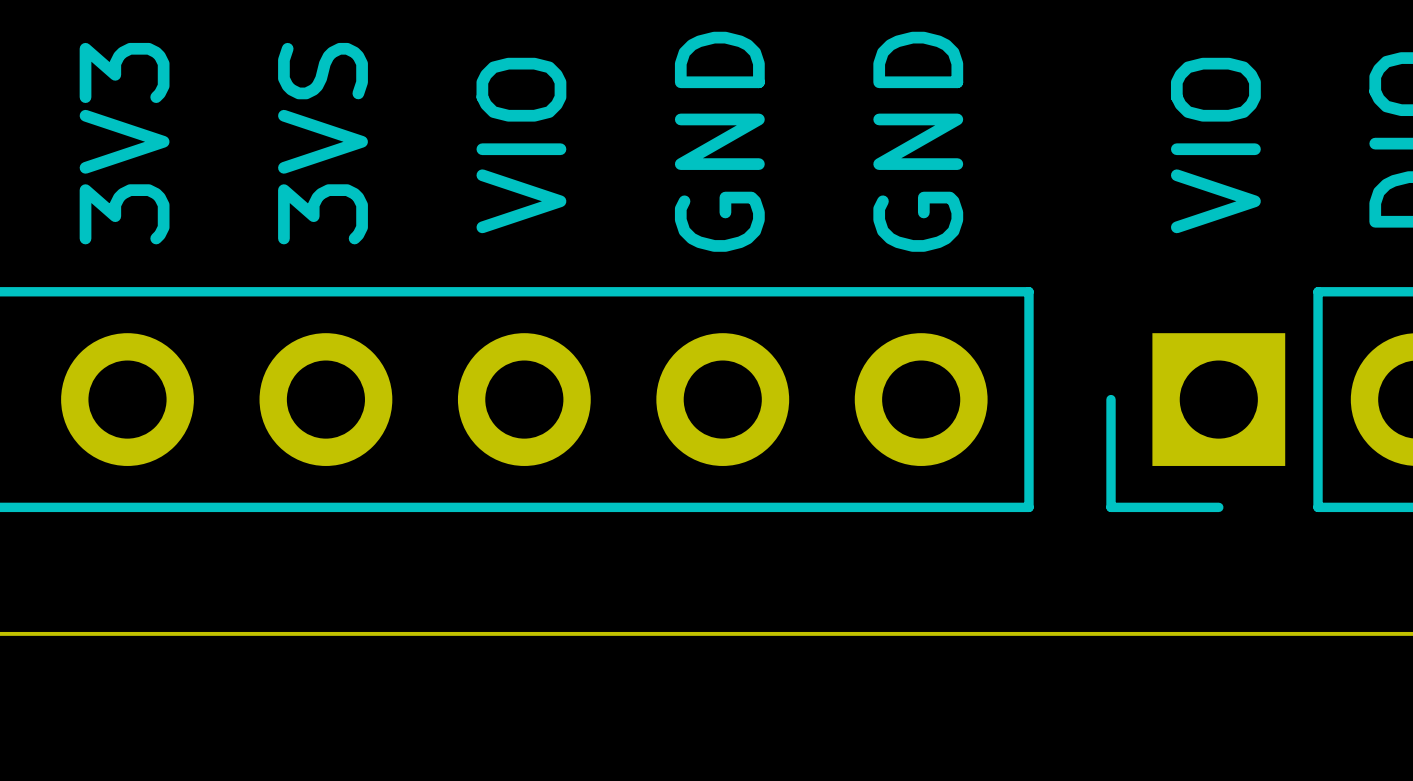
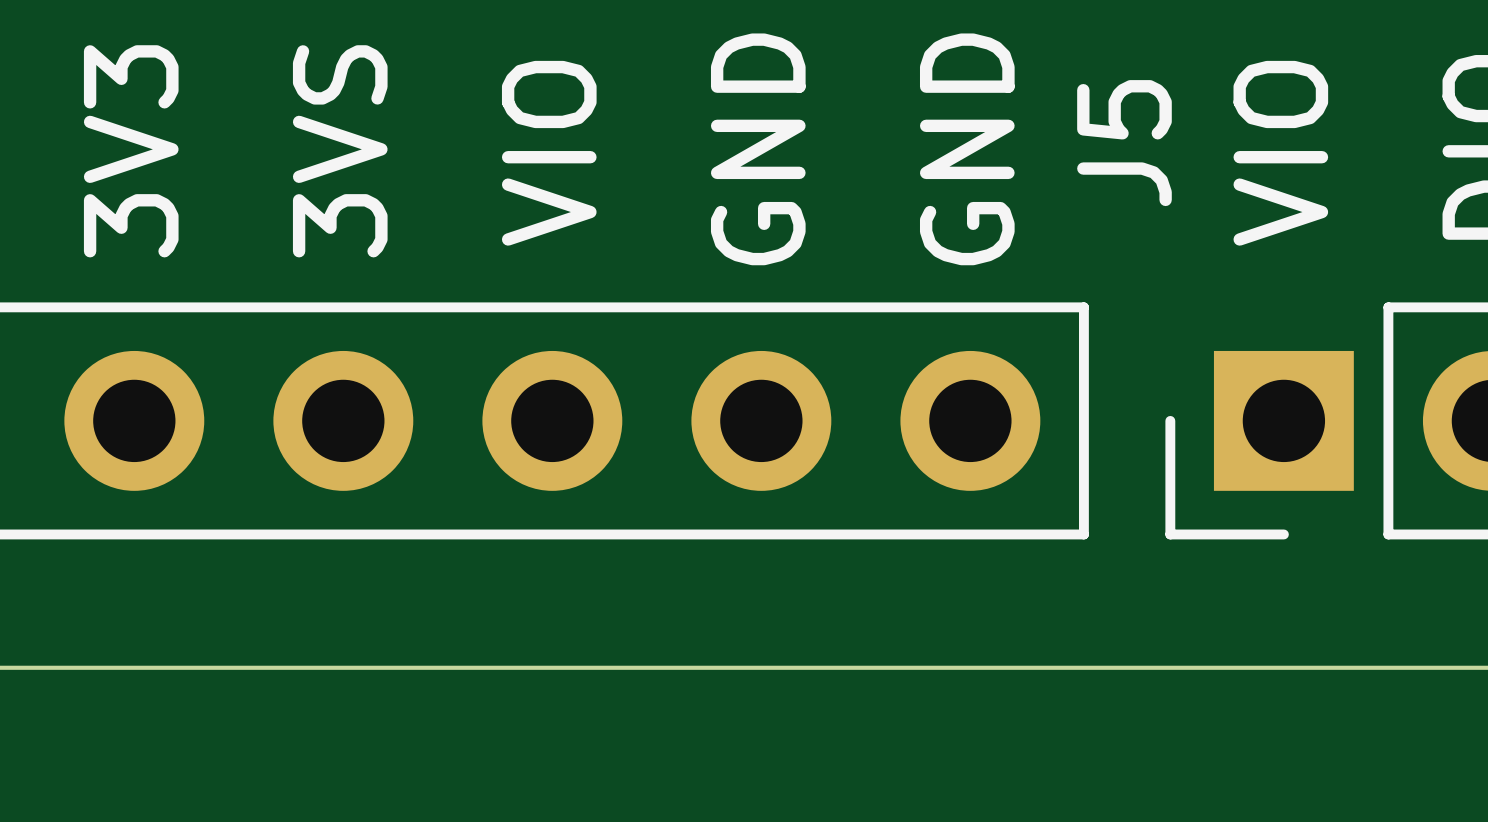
J5 name: none -> J5 (1124, 143)

